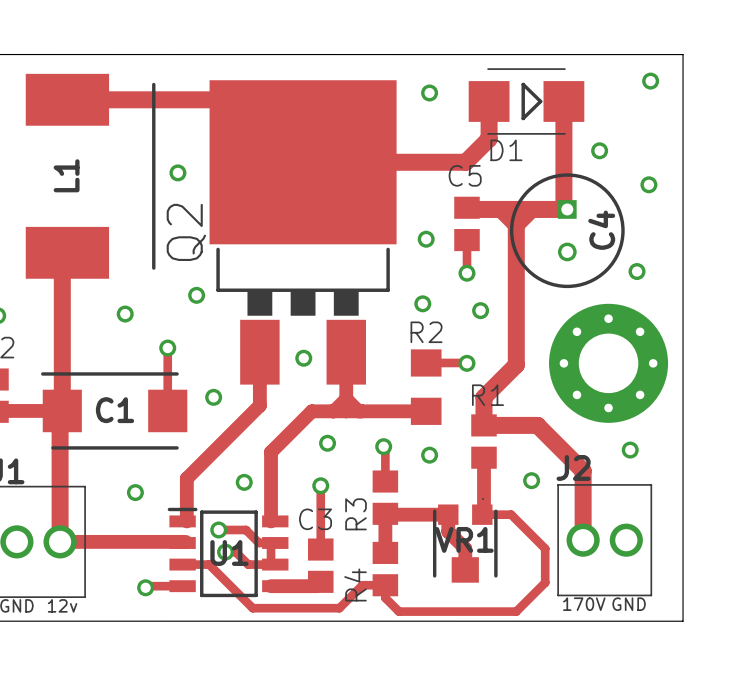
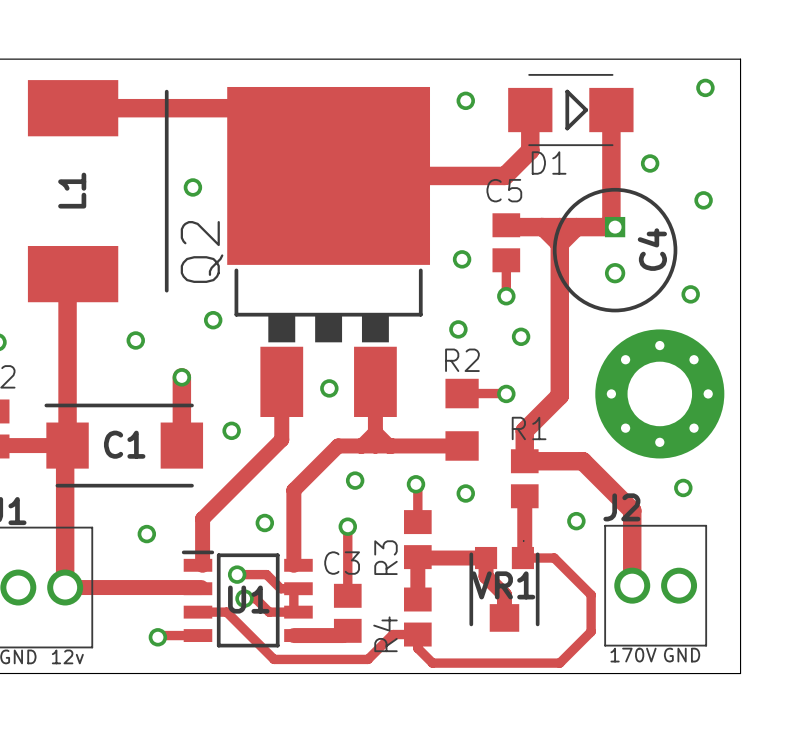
track width: thin (167, 348) (167, 410) -> thick (181, 377) (181, 445)

